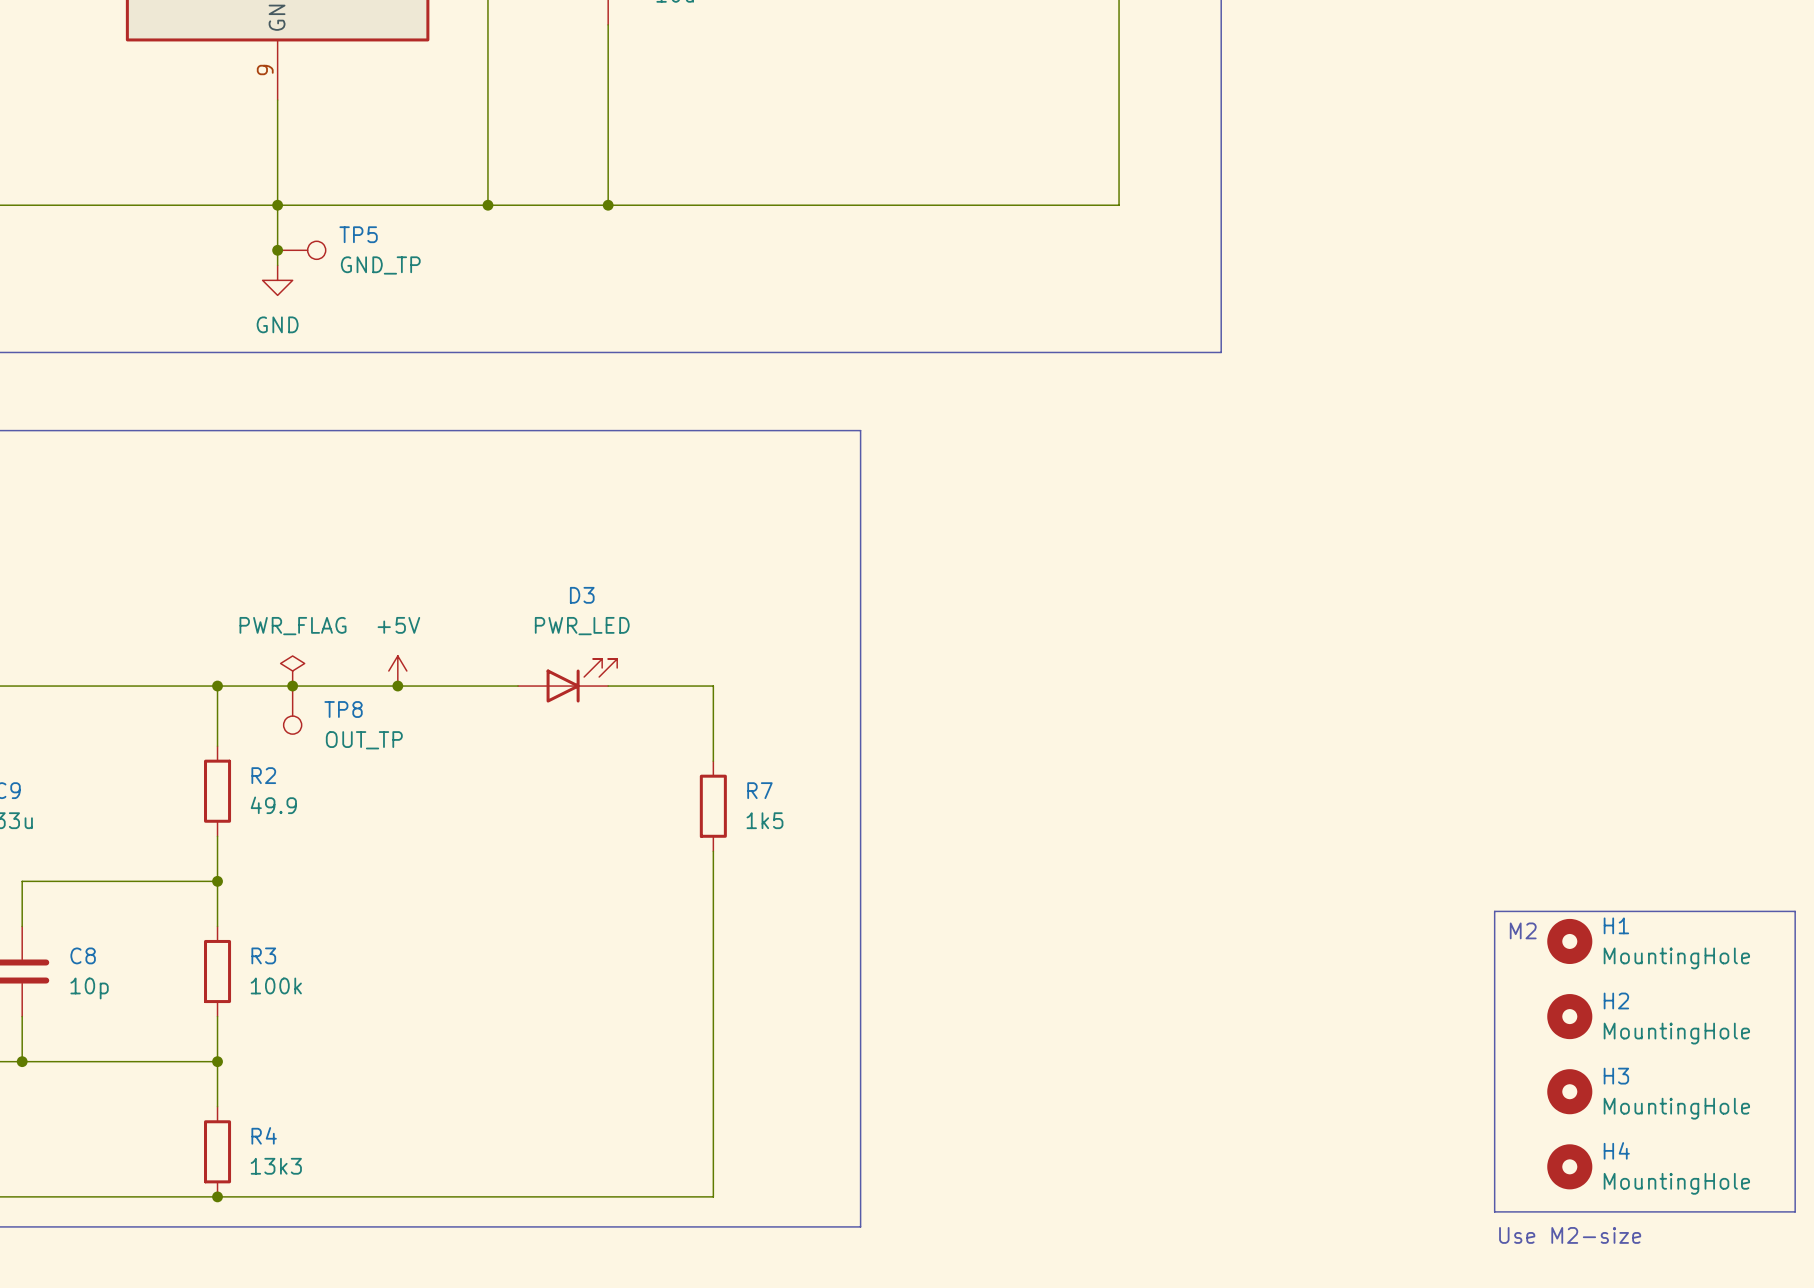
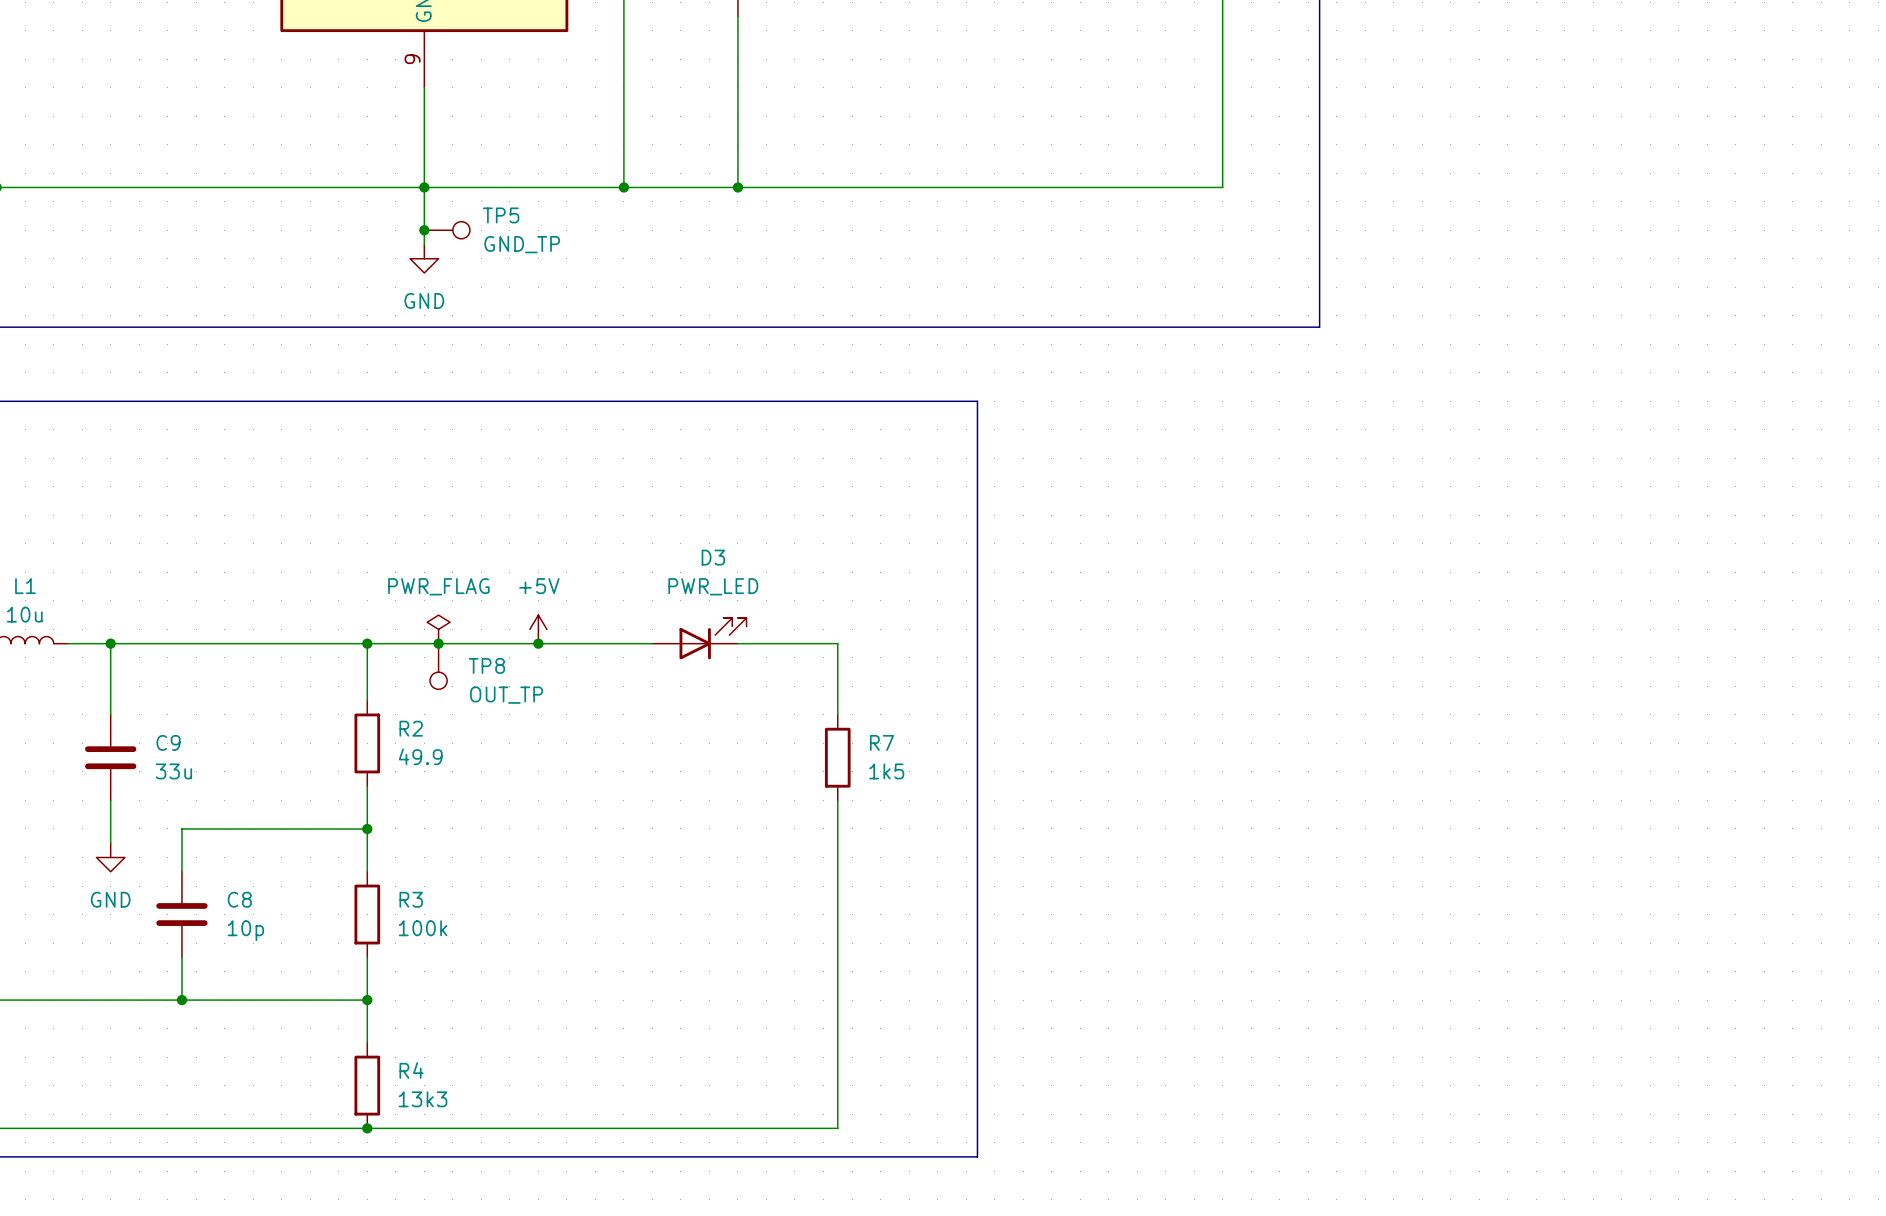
line: (1494, 911) (1795, 911) (1795, 1211) (1494, 1211) (1494, 911) -> none
text: M2 (1523, 930) -> none
H1: MountingHole (1569, 941) -> none
H2: MountingHole (1569, 1016) -> none
H3: MountingHole (1569, 1091) -> none
H4: MountingHole (1569, 1166) -> none
text: Use M2-size (1570, 1235) -> none

